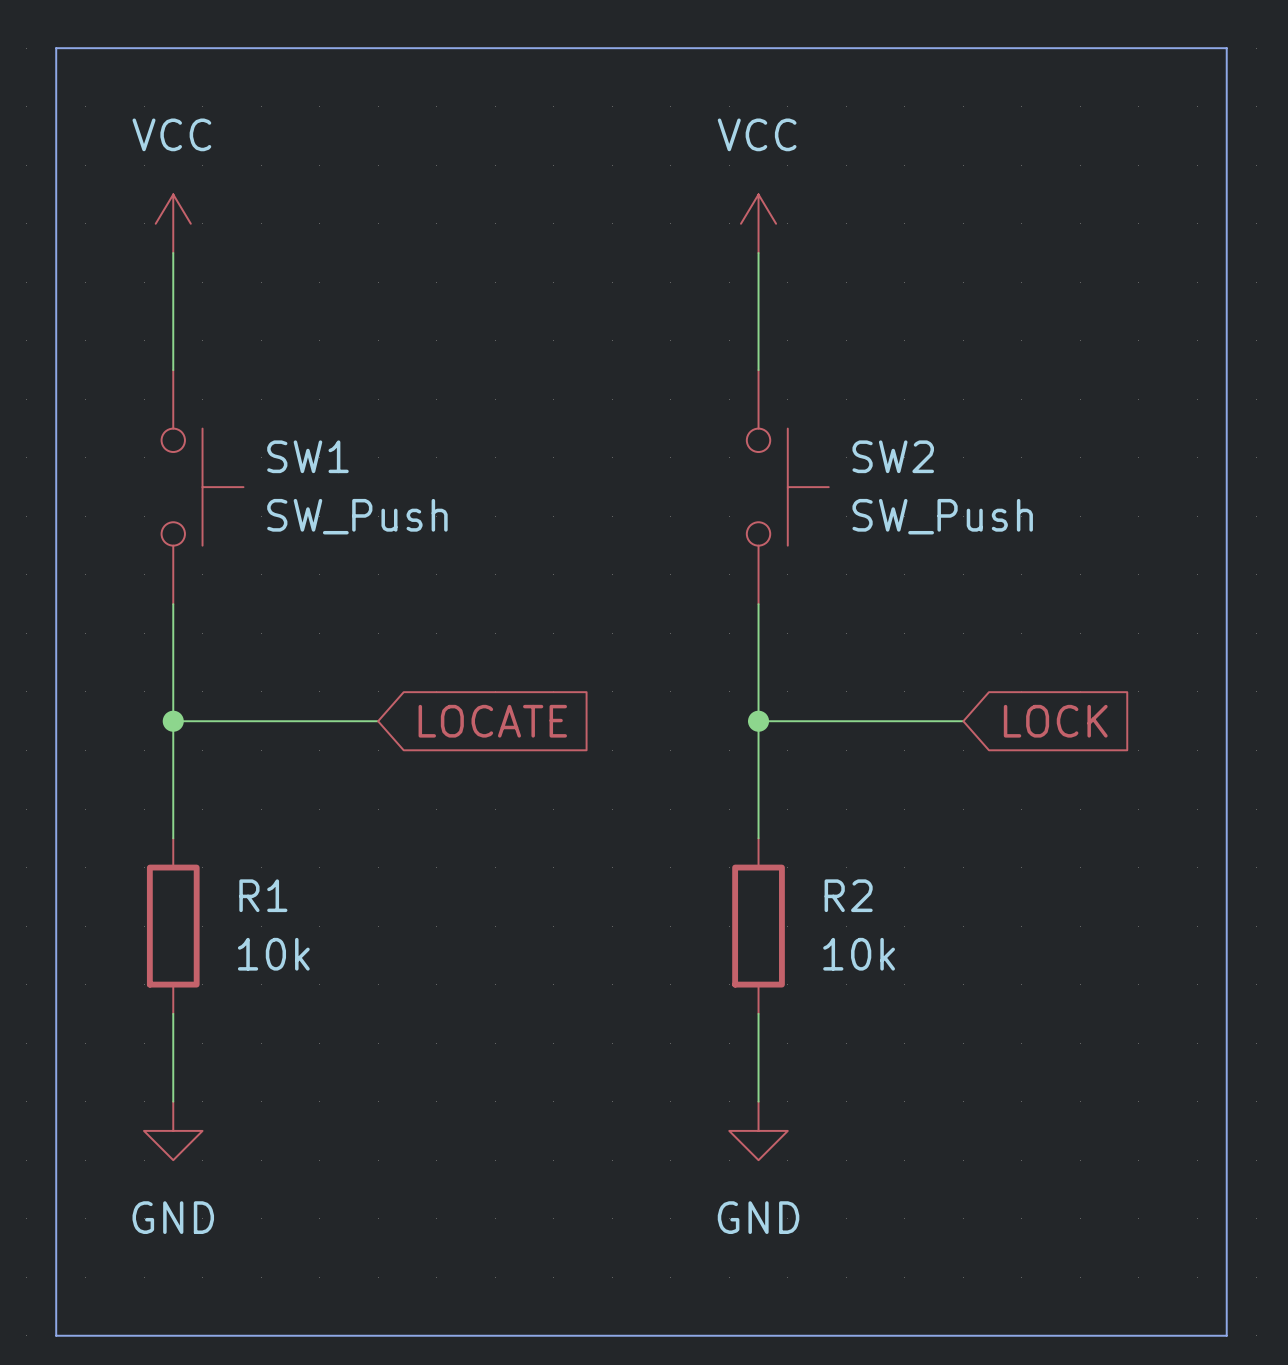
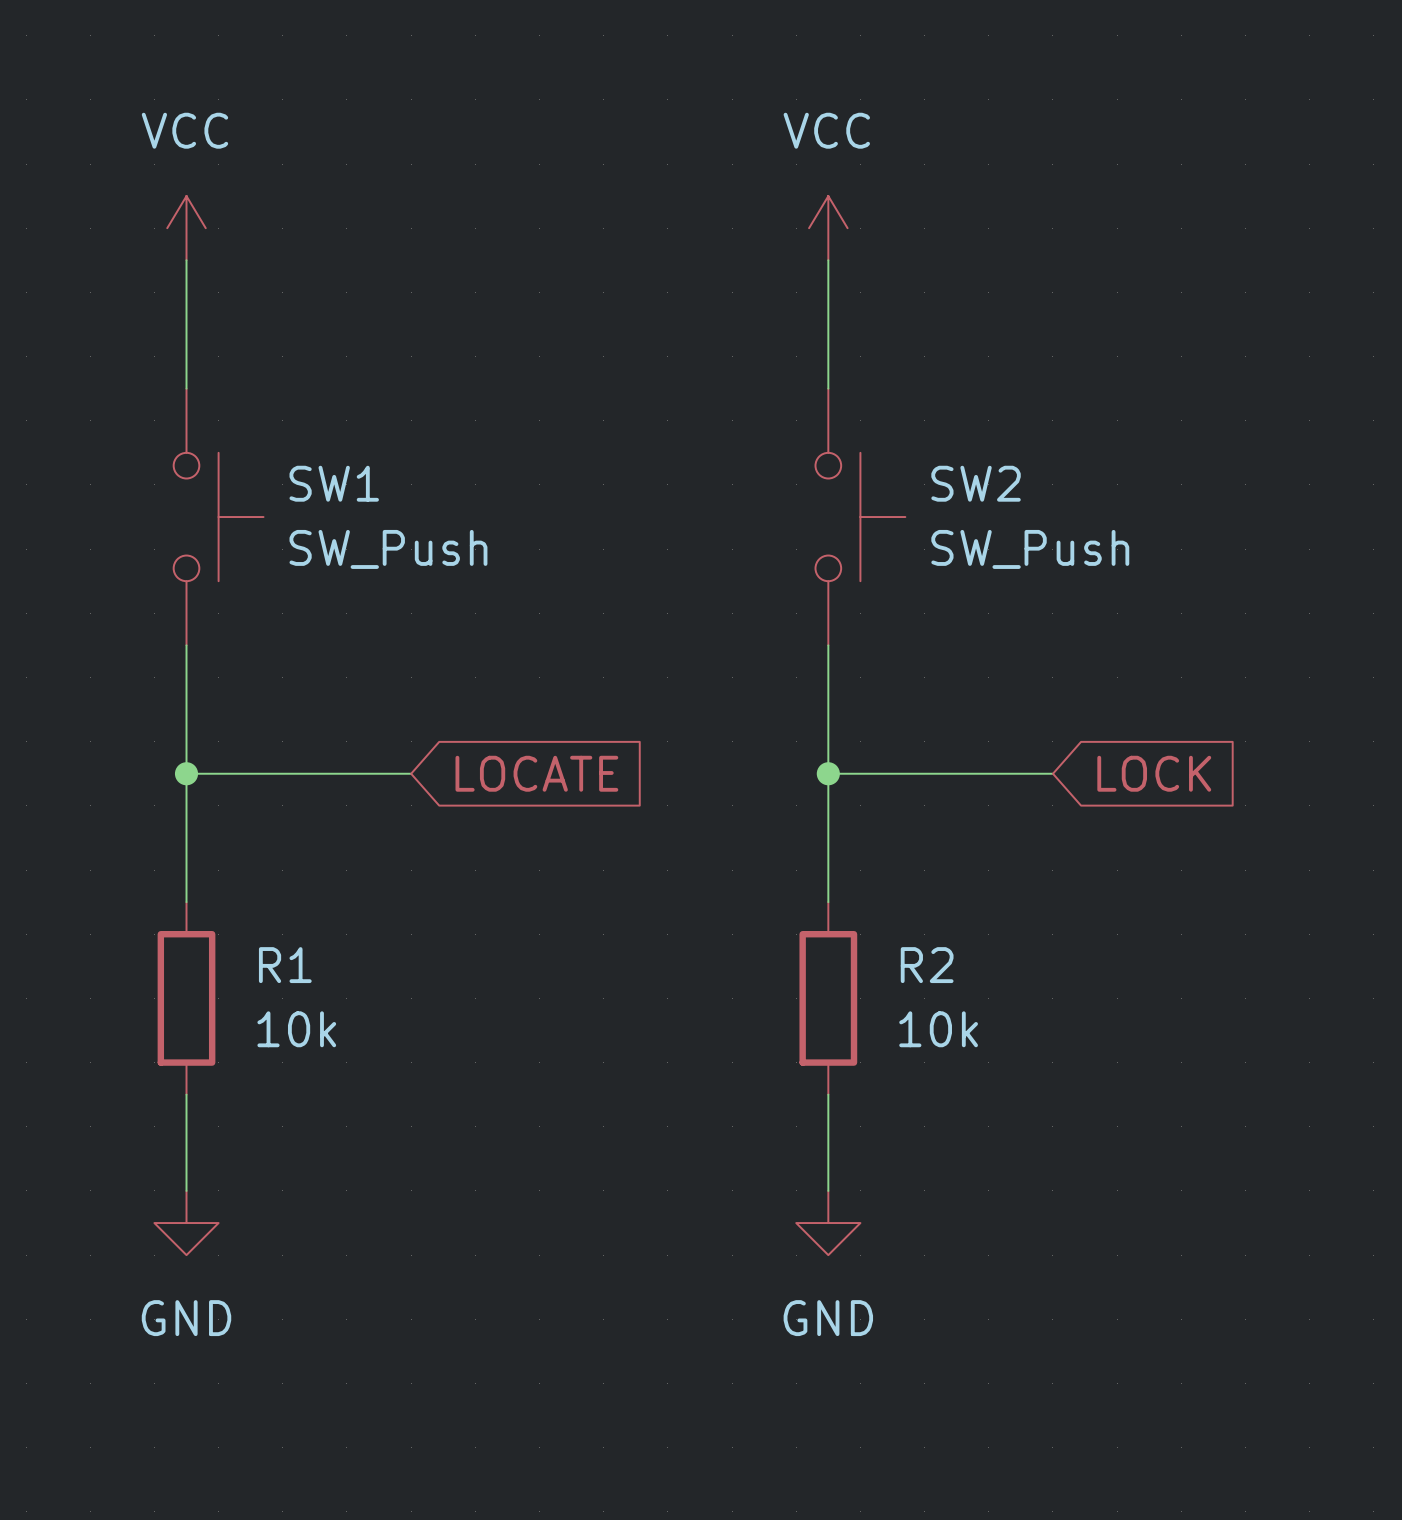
line: (56, 48) (1226, 48) (1226, 1335) (56, 1335) (56, 48) -> none

